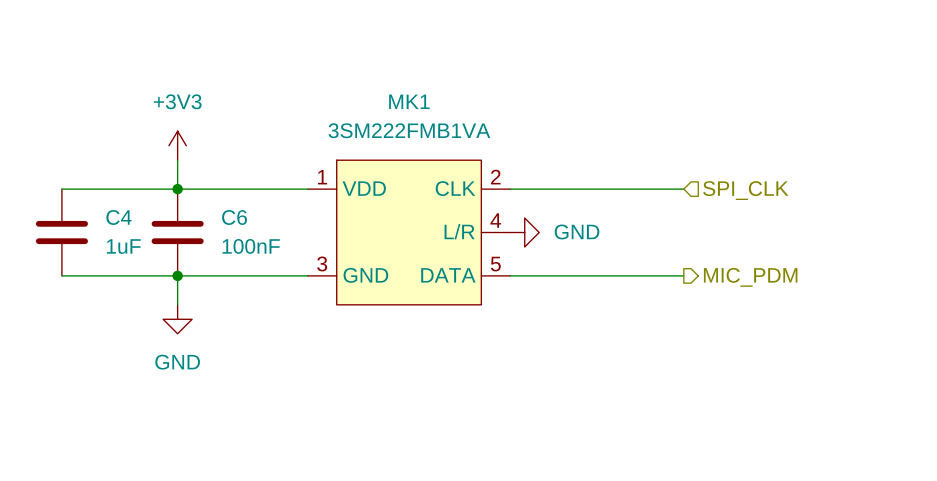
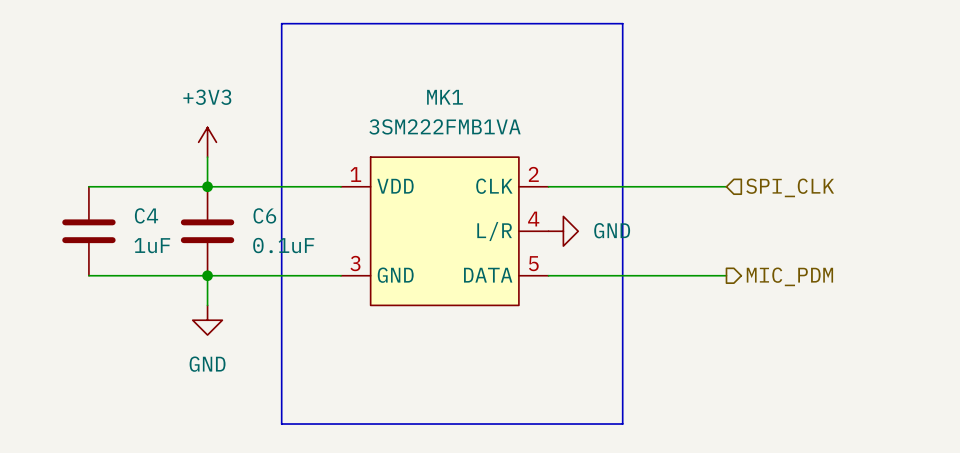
line: none -> (281, 23) (622, 23) (622, 424) (281, 424) (281, 23)
C6 value: 100nF (251, 246) -> 0.1uF (283, 245)

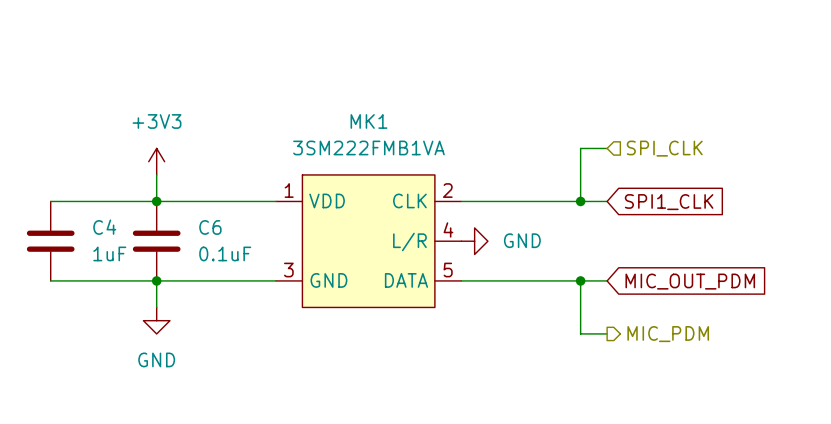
line: (281, 23) (622, 23) (622, 424) (281, 424) (281, 23) -> none
wire: none -> (607, 148) (580, 148) (580, 201)
junction: none -> (580, 201)
wire: (711, 186) (726, 186) -> none
hierarchical label position: SPI_CLK (790, 187) -> SPI_CLK (664, 148)
global label: none -> SPI1_CLK (669, 202)
wire: none -> (580, 280) (580, 333) (607, 333)
junction: none -> (580, 280)
wire: (711, 275) (726, 275) -> none
hierarchical label position: MIC_PDM (789, 276) -> MIC_PDM (668, 334)
global label: none -> MIC_OUT_PDM (690, 281)

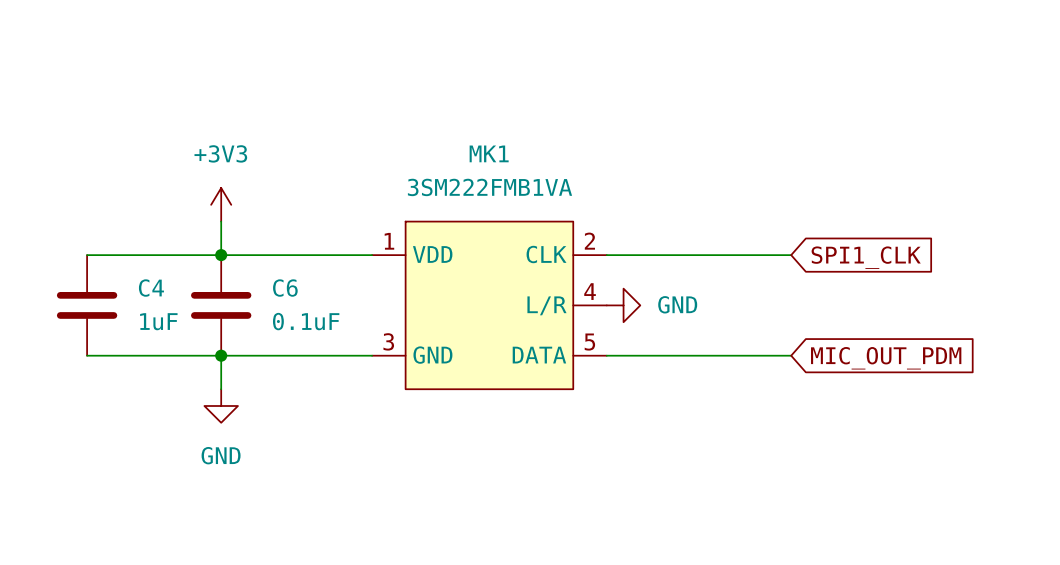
wire: (607, 148) (580, 148) (580, 201) -> none
hierarchical label: SPI_CLK (664, 148) -> none
junction: (580, 201) -> none
wire: (580, 280) (580, 333) (607, 333) -> none
junction: (580, 280) -> none
hierarchical label: MIC_PDM (668, 334) -> none

